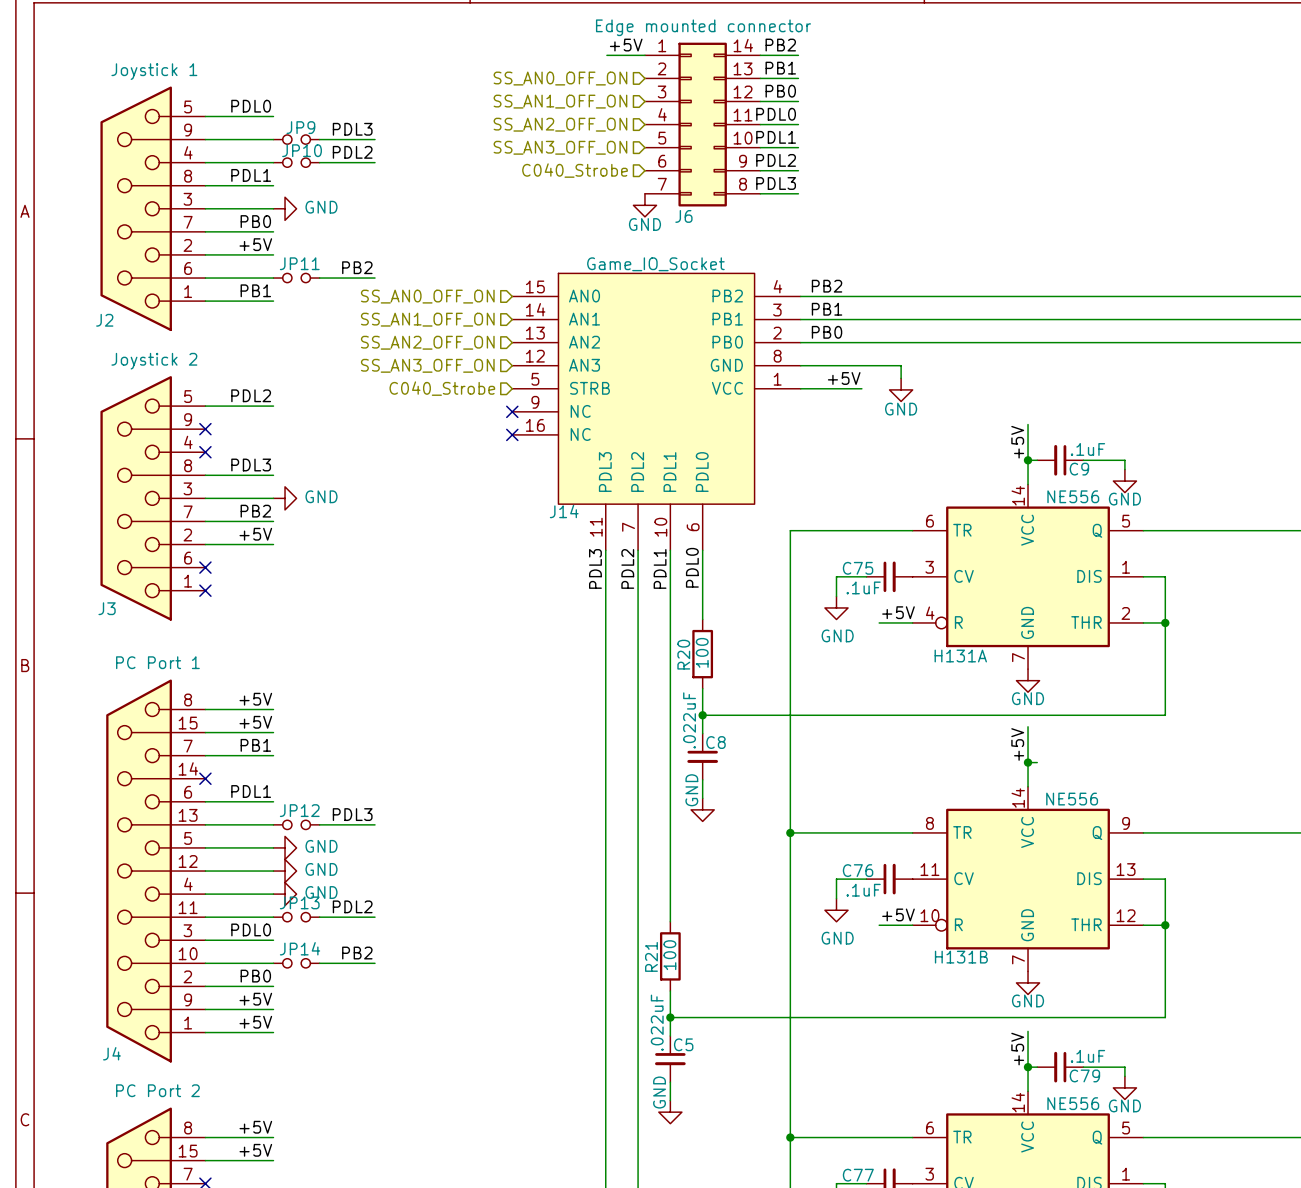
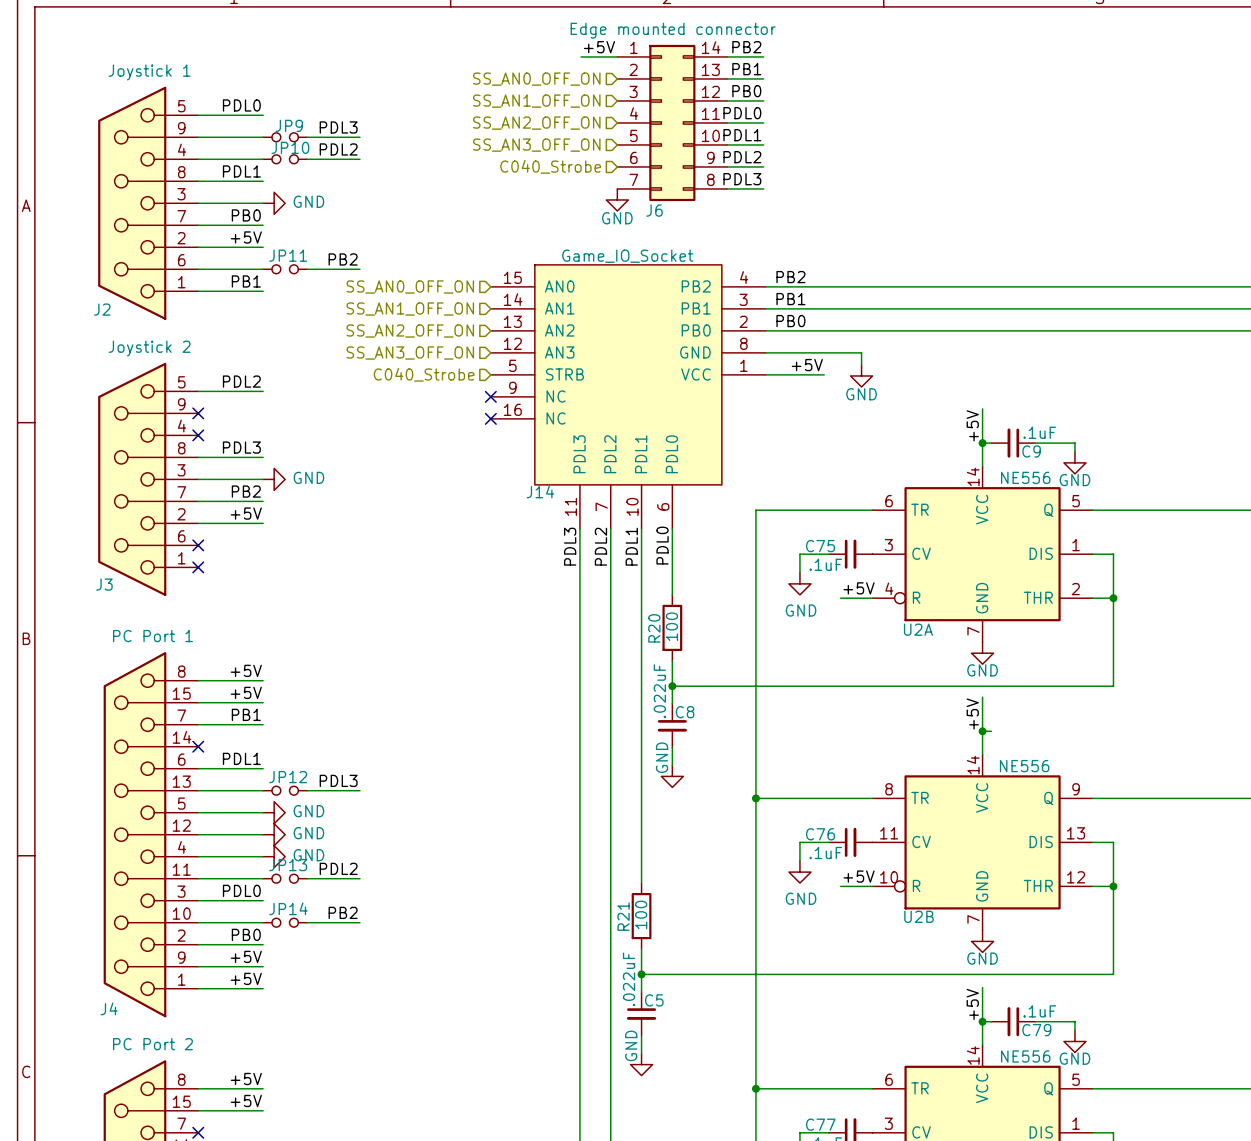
H131A name: H131A (960, 656) -> U2A (918, 629)
H131B name: H131B (961, 957) -> U2B (919, 916)

